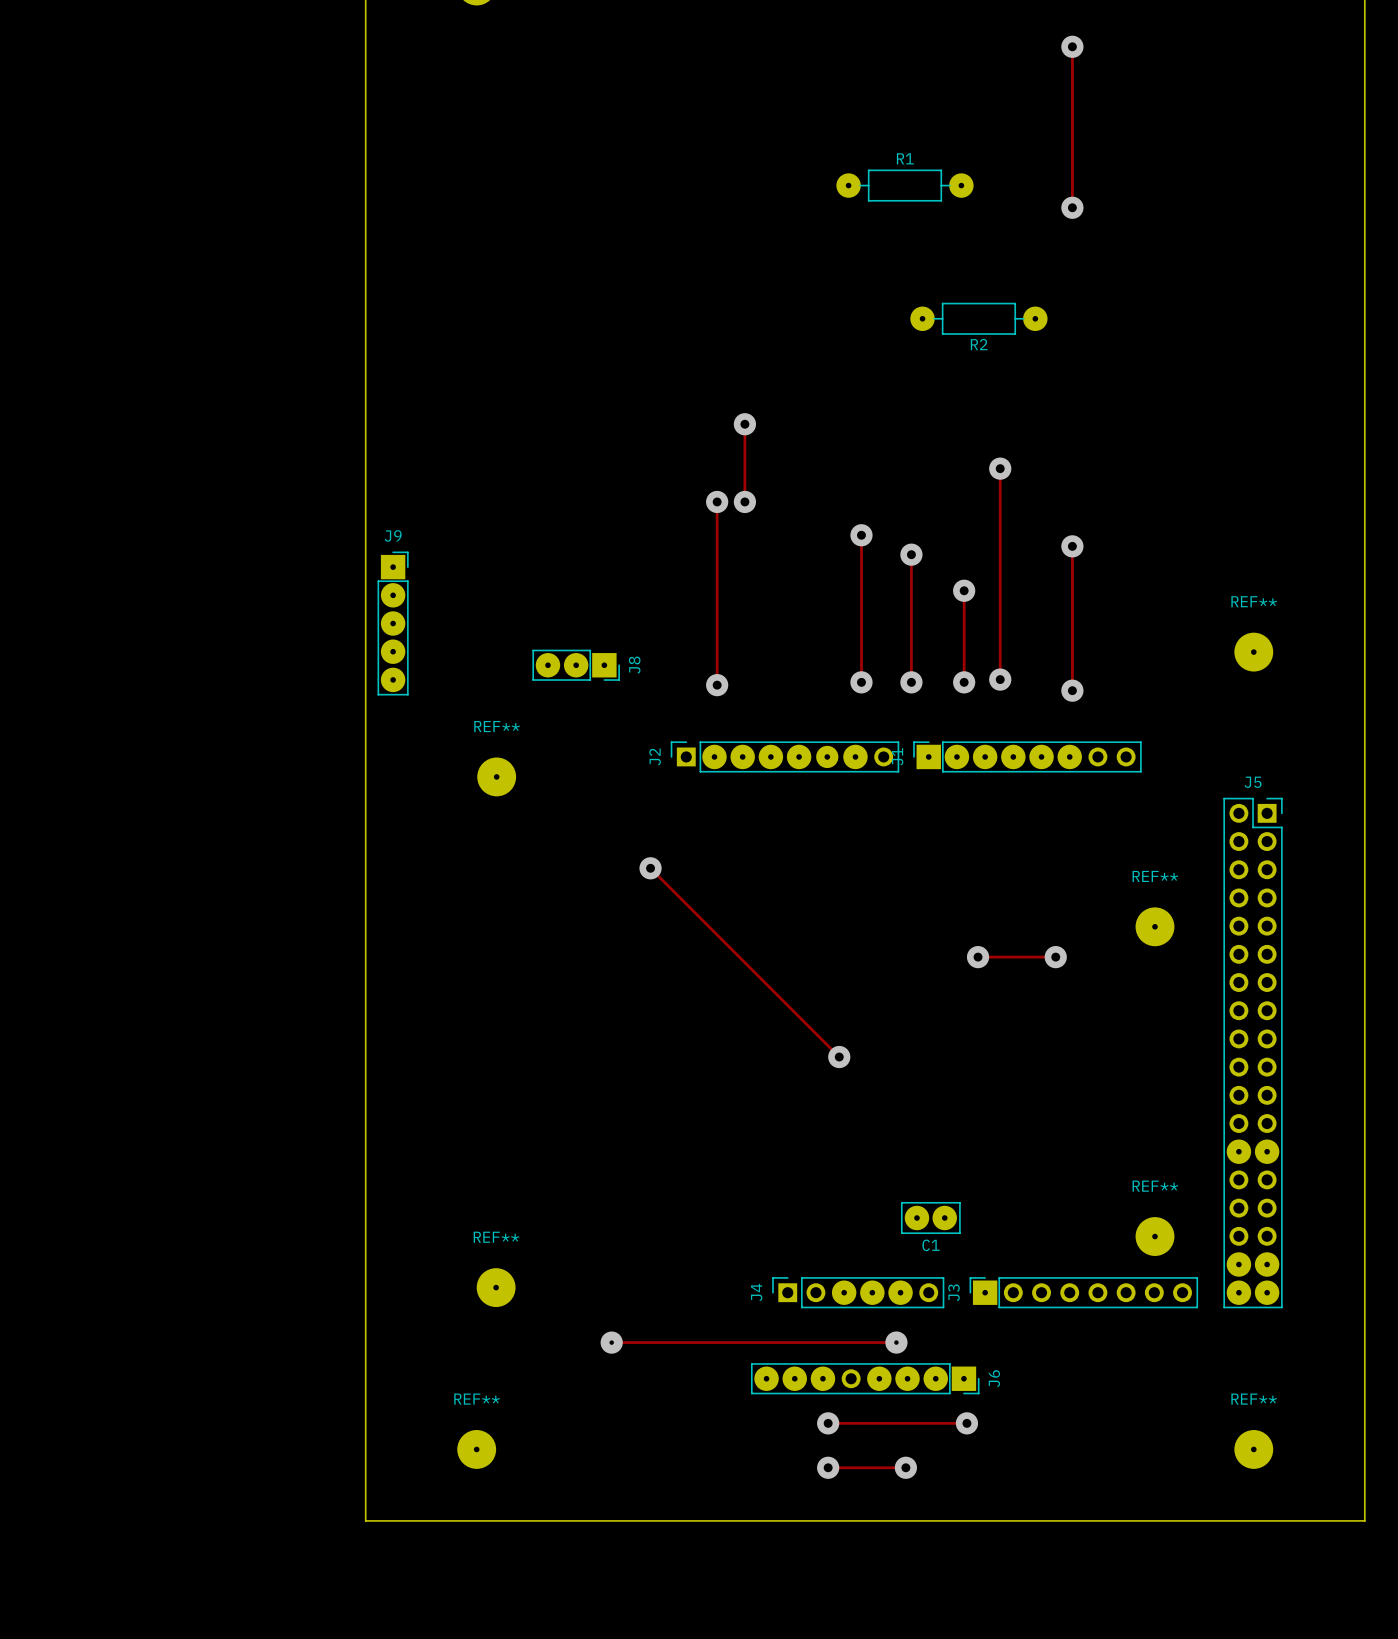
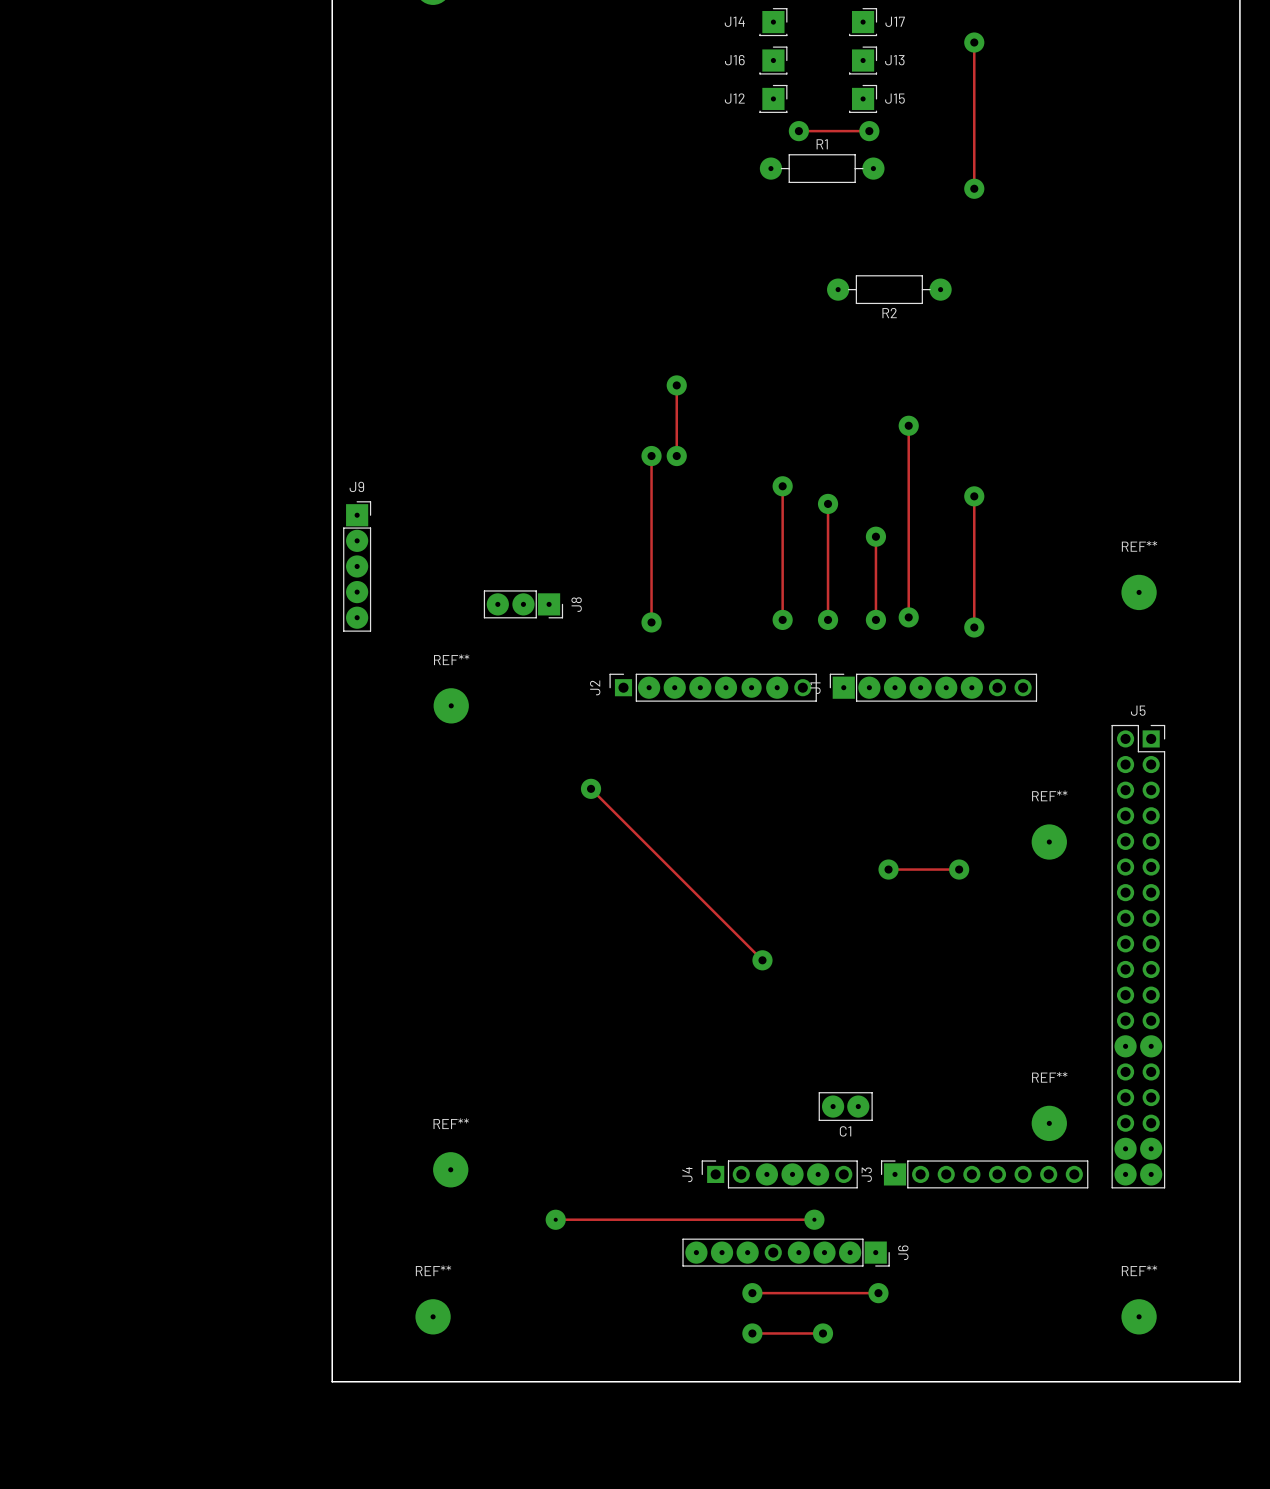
J14: none -> (773, 22)
J17: none -> (863, 22)
J16: none -> (773, 60)
J13: none -> (863, 60)
J12: none -> (773, 98)
J15: none -> (863, 98)
track: none -> (798, 131) (869, 131)
via: none -> (798, 131)
via: none -> (869, 131)

